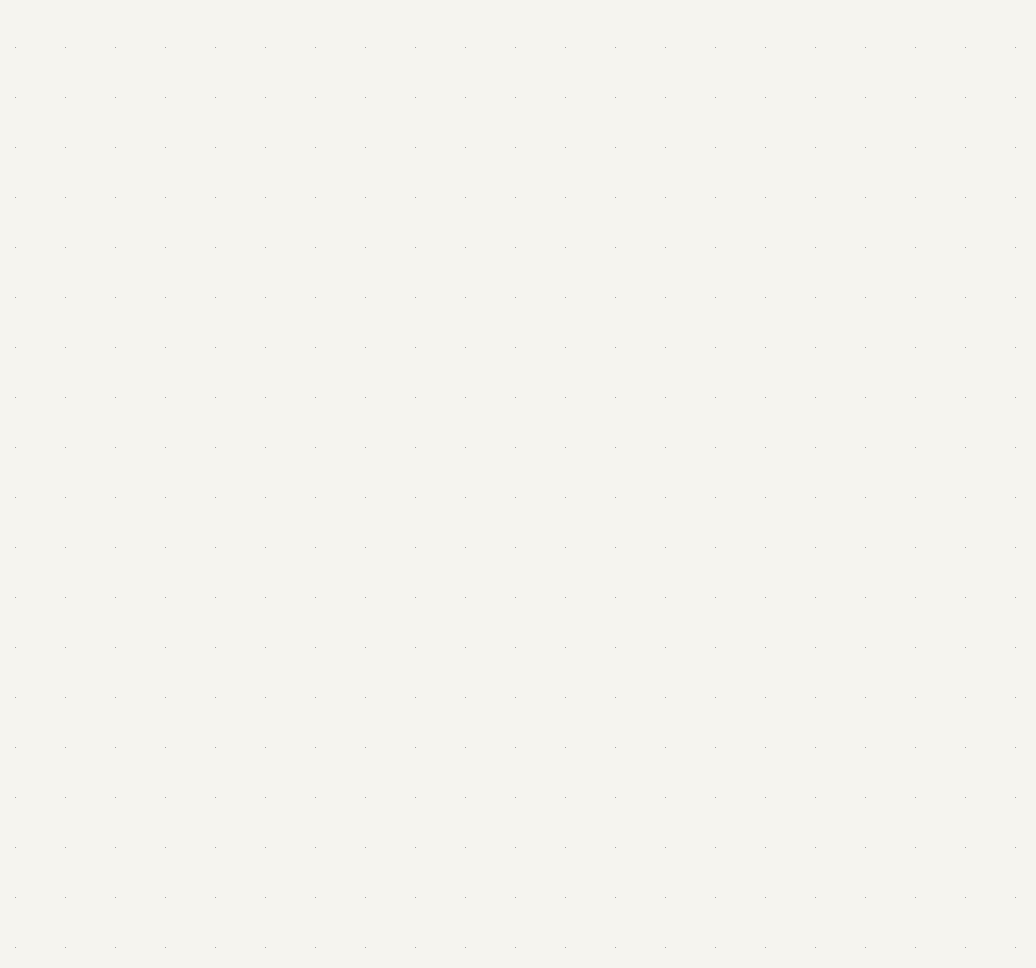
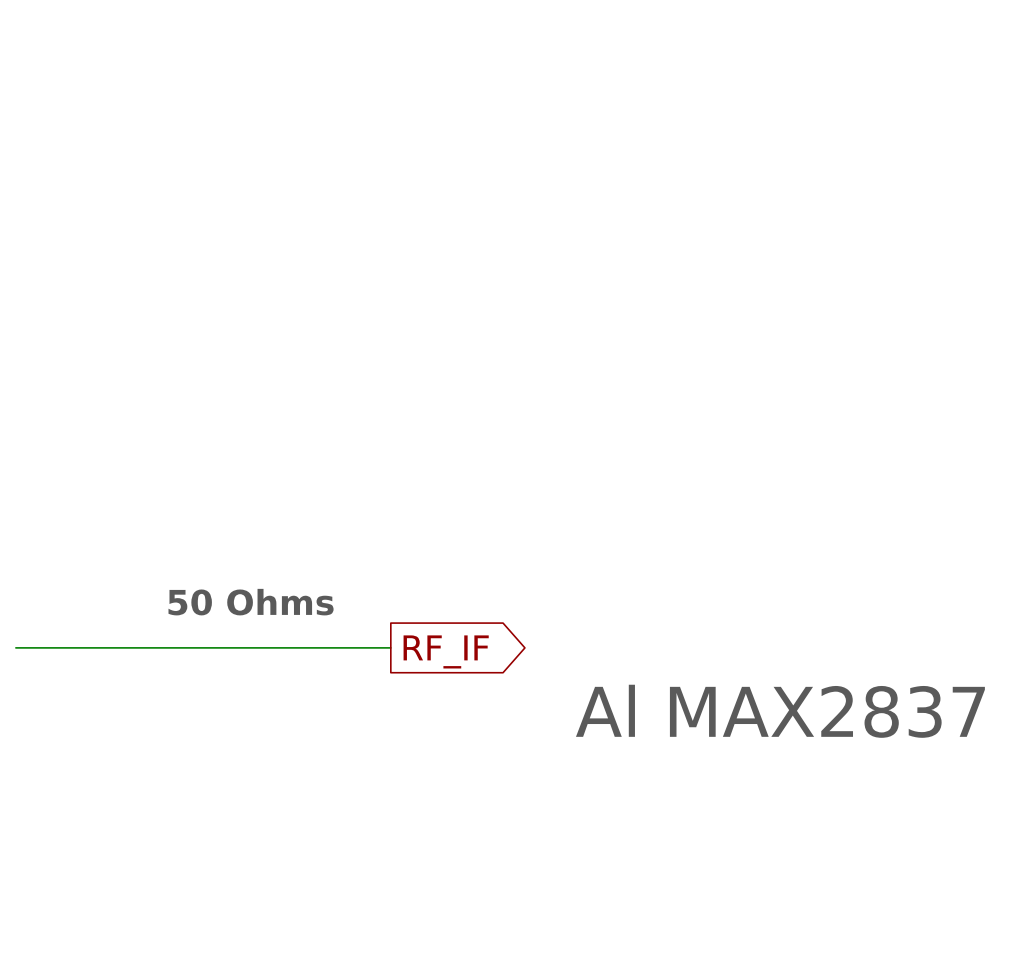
text: none -> 50 Ohms (251, 602)
wire: none -> (15, 647) (390, 647)
global label: none -> RF_IF (446, 651)
text: none -> Al MAX2837 (780, 711)

